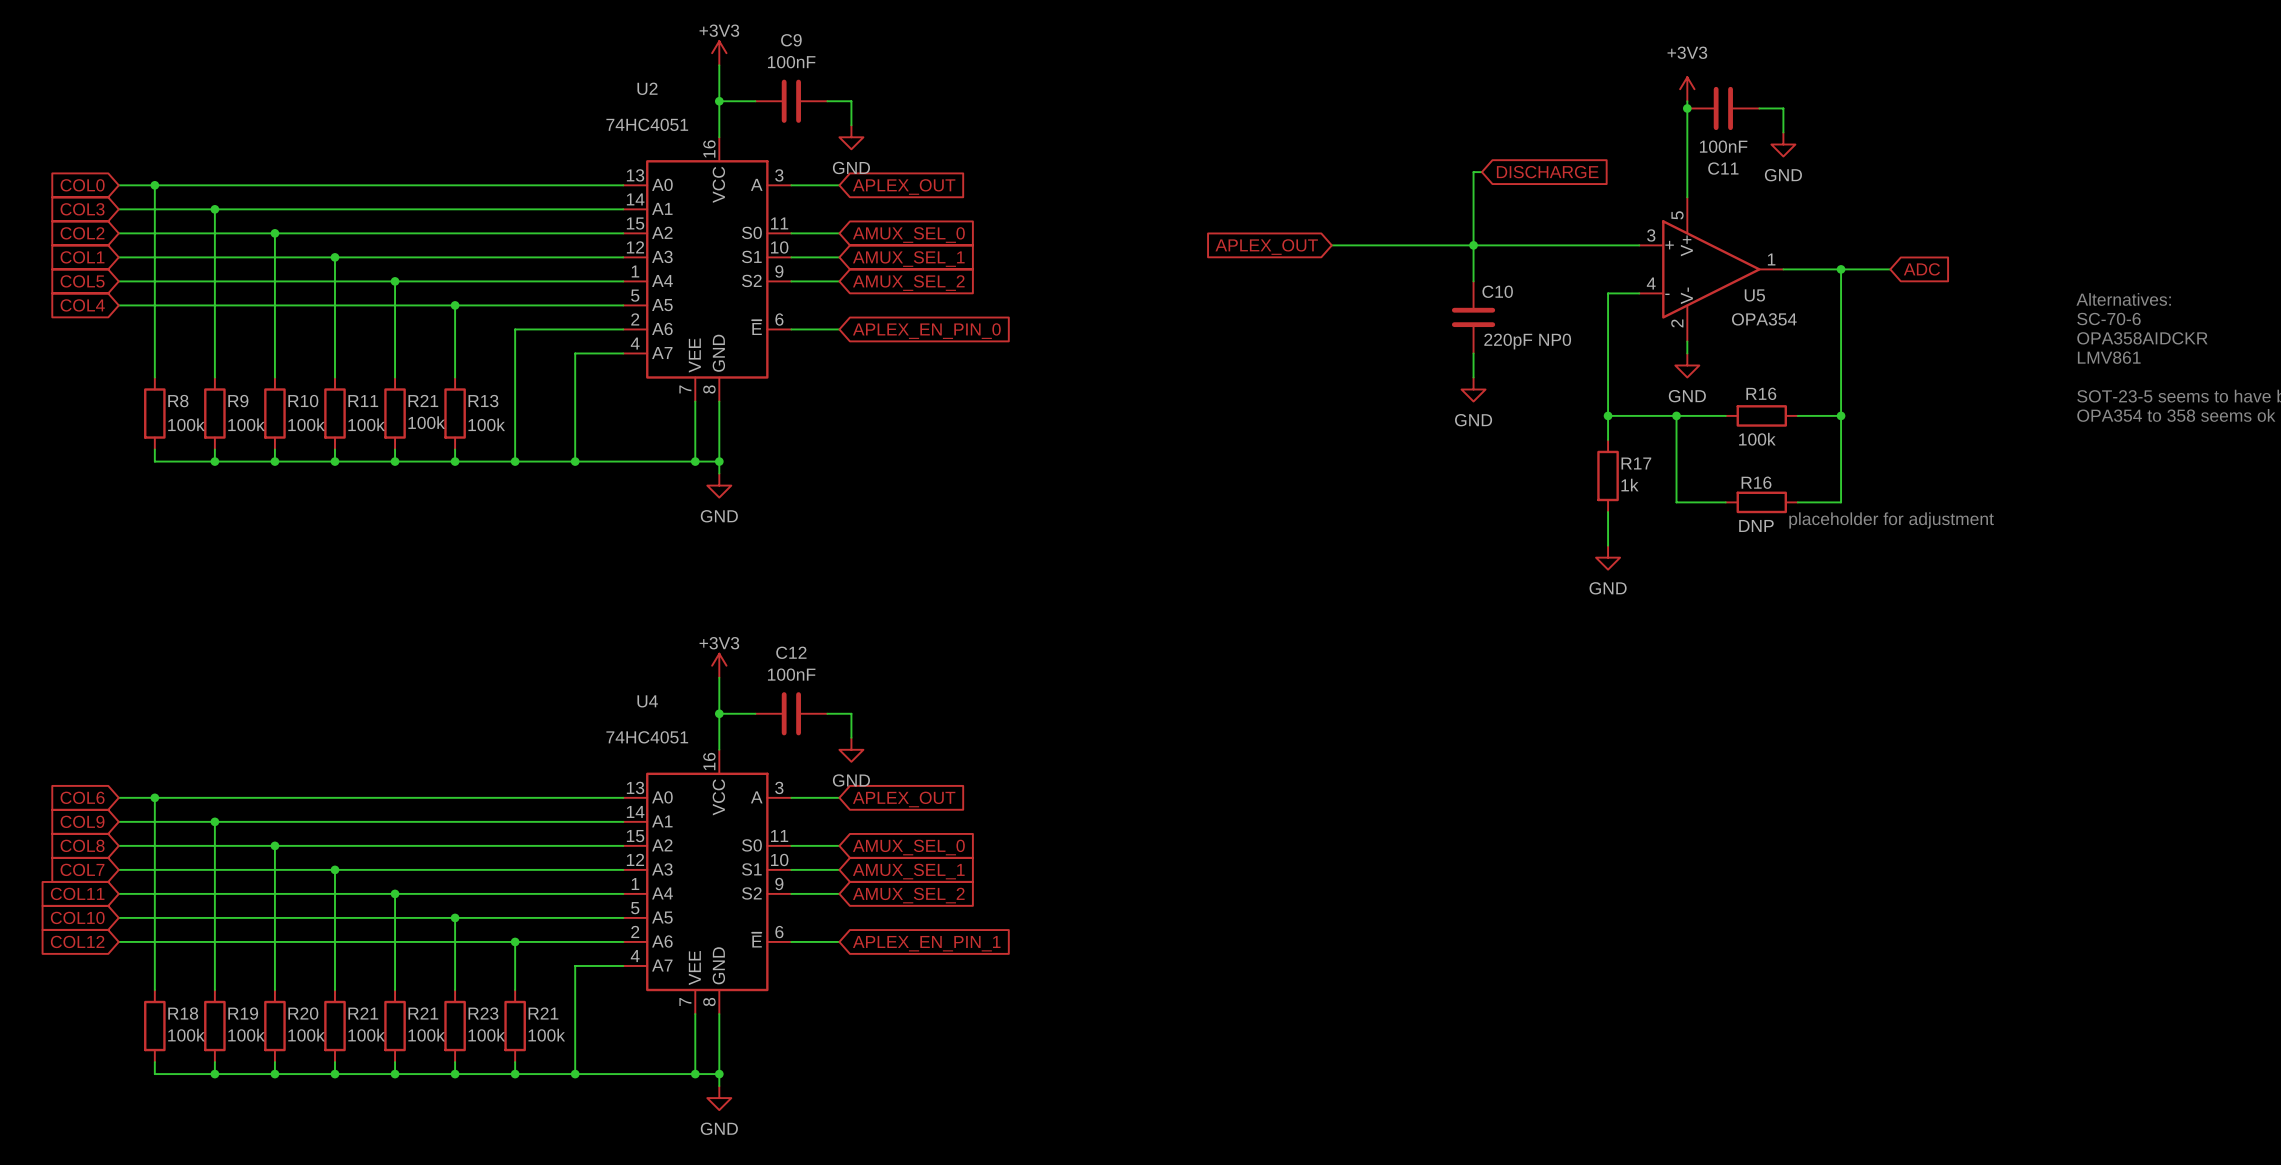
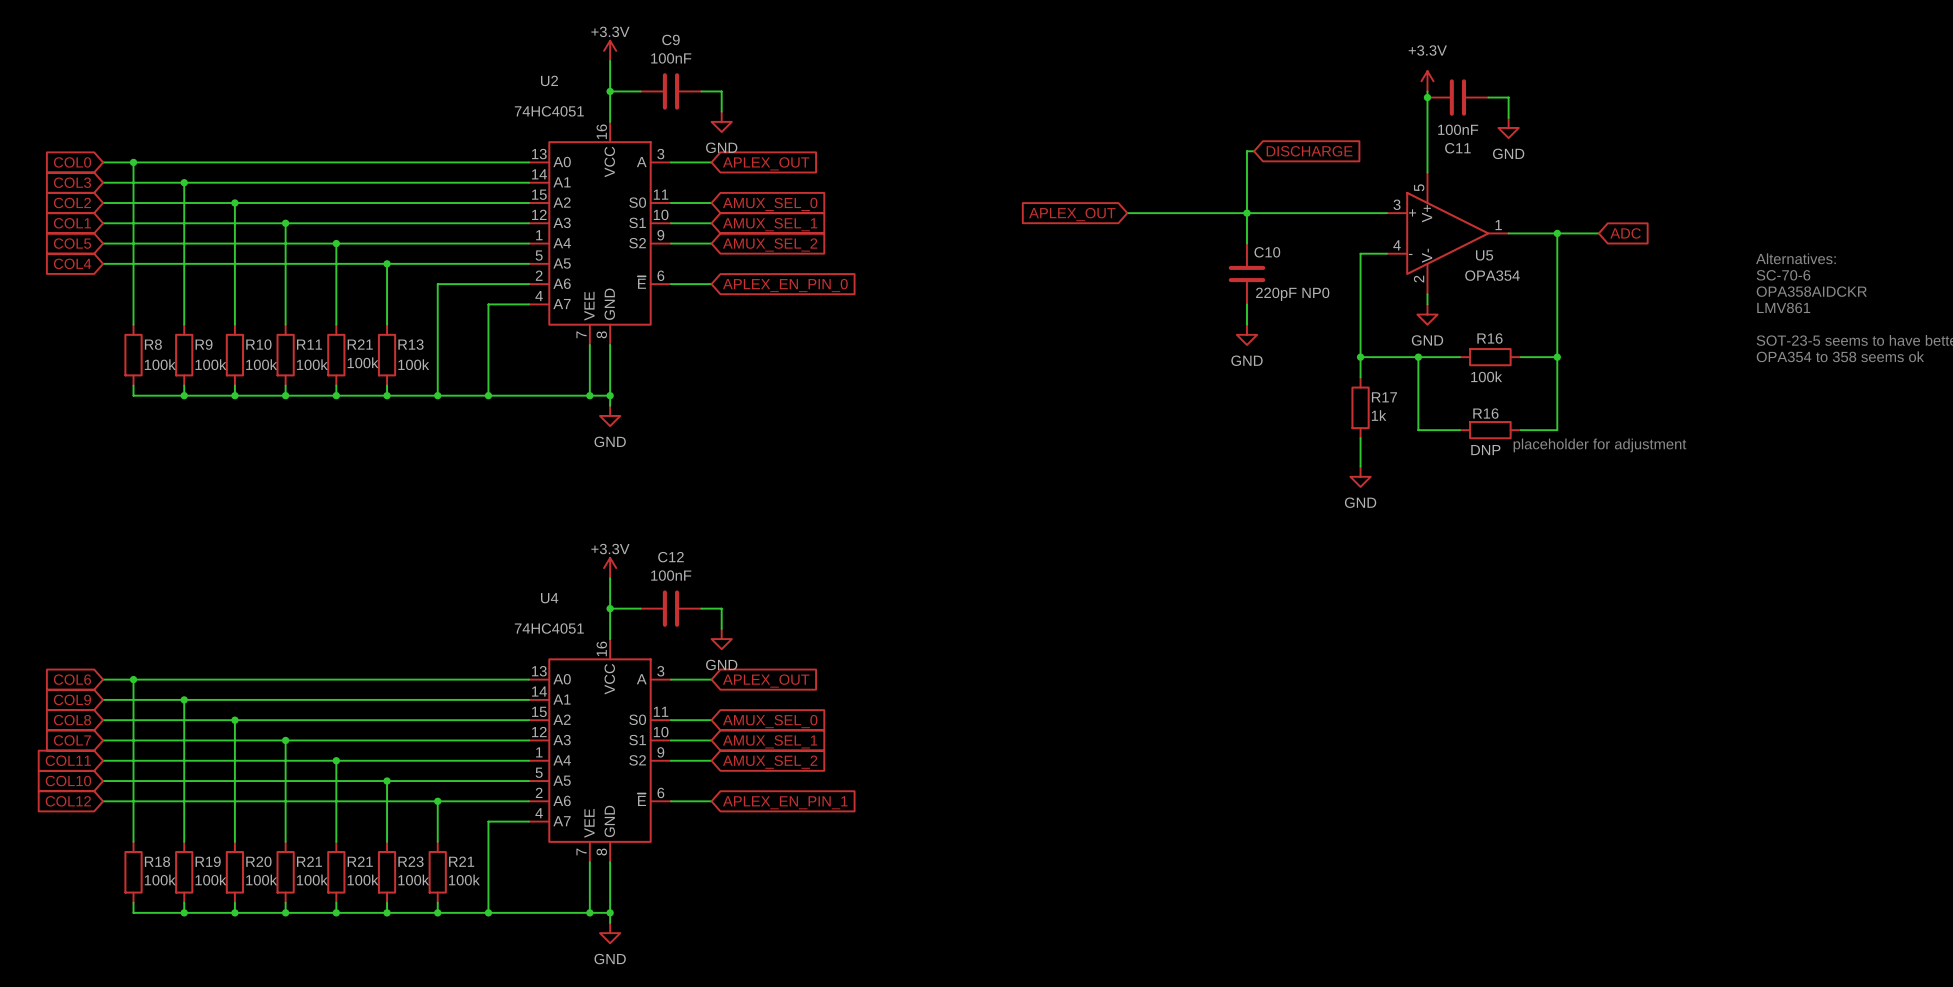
power symbol: +3V3 (719, 53) -> +3.3V (610, 50)
power symbol: +3V3 (1687, 89) -> +3.3V (1427, 81)
power symbol: +3V3 (719, 665) -> +3.3V (610, 568)

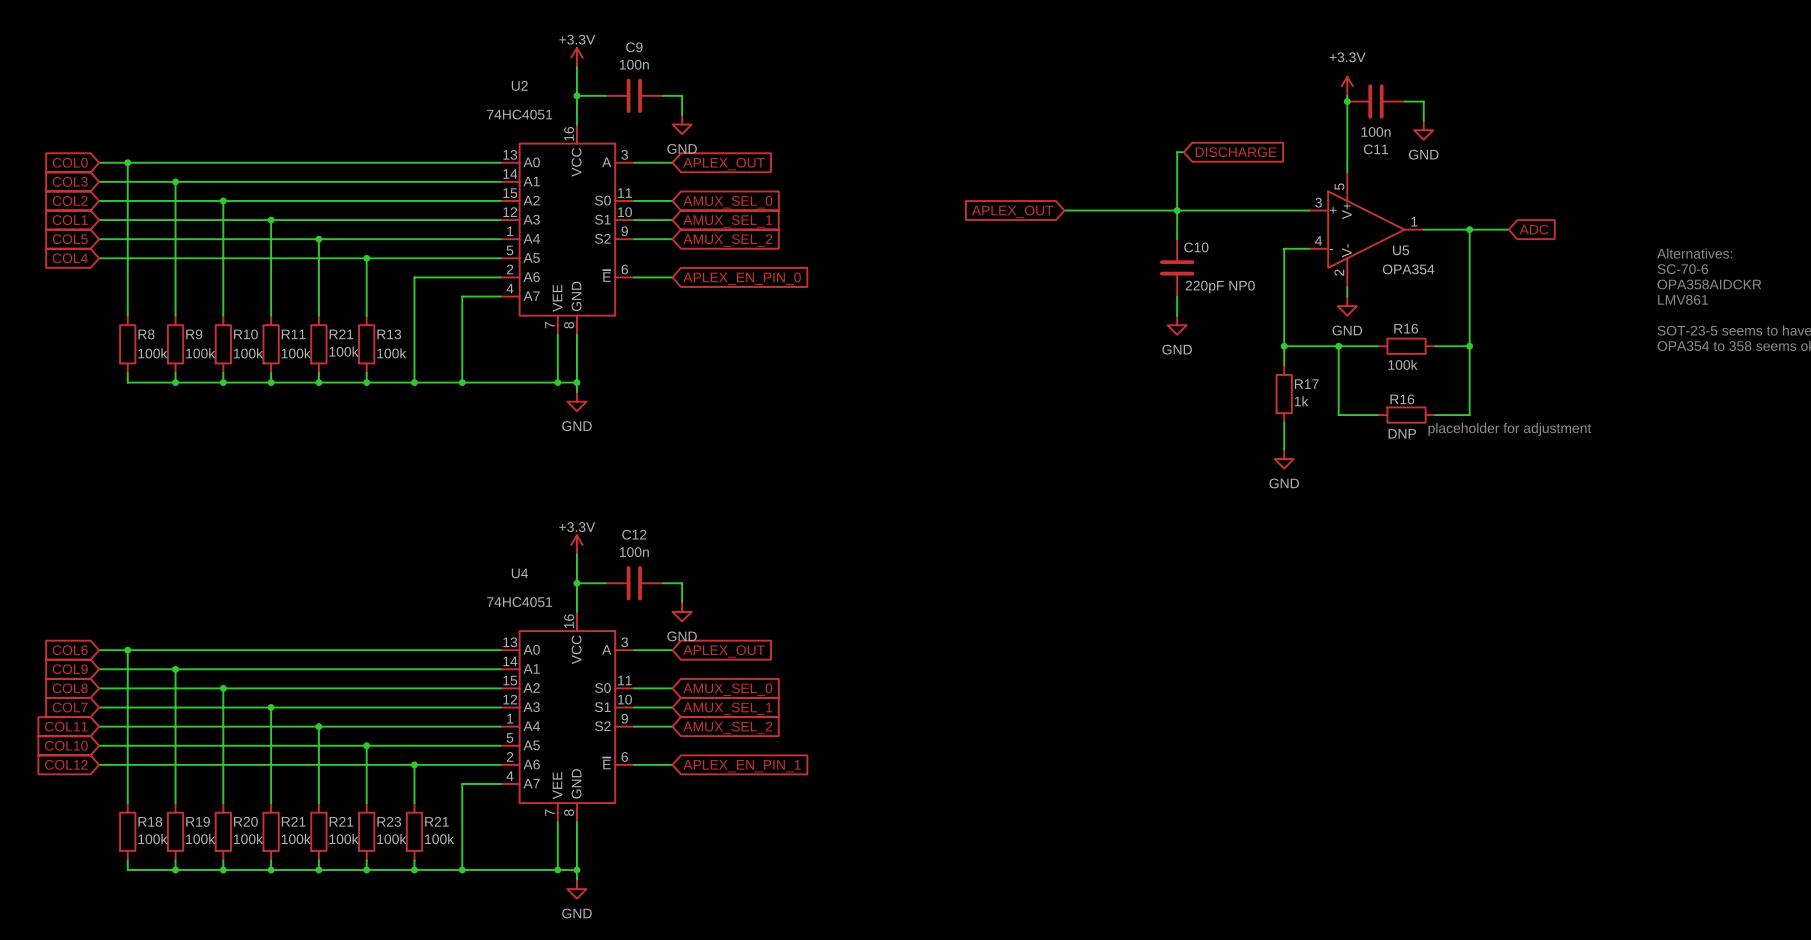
C9 value: 100nF (671, 58) -> 100n (634, 64)
C11 value: 100nF (1458, 129) -> 100n (1376, 131)
C12 value: 100nF (671, 575) -> 100n (634, 552)

